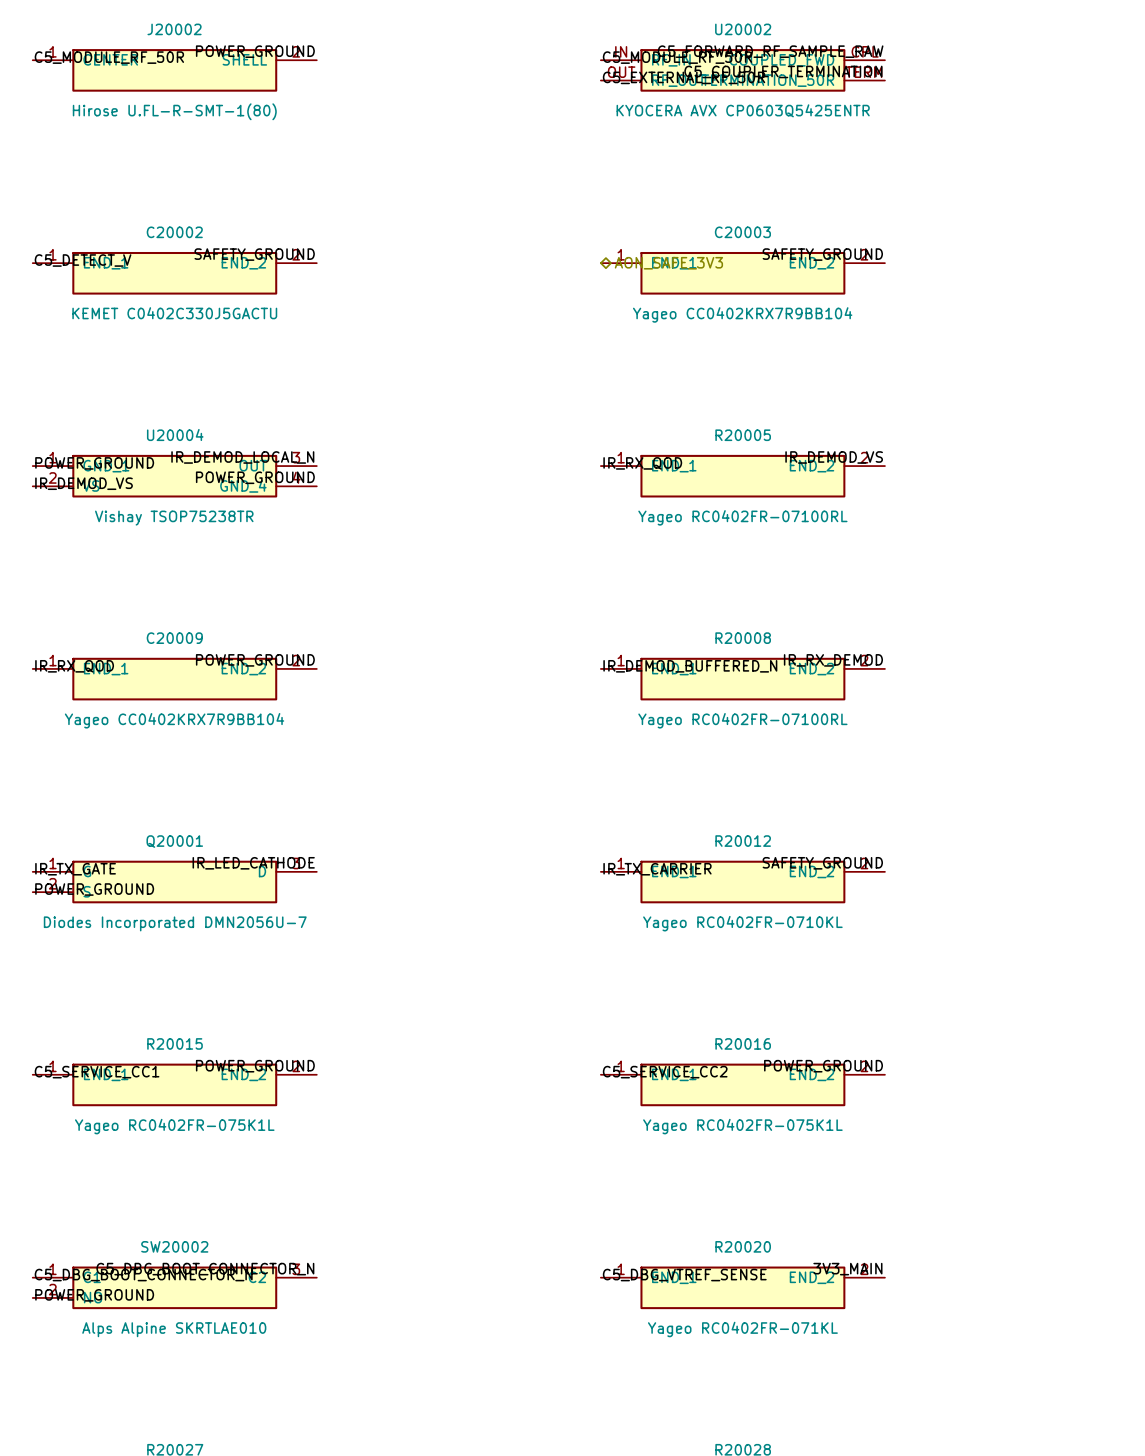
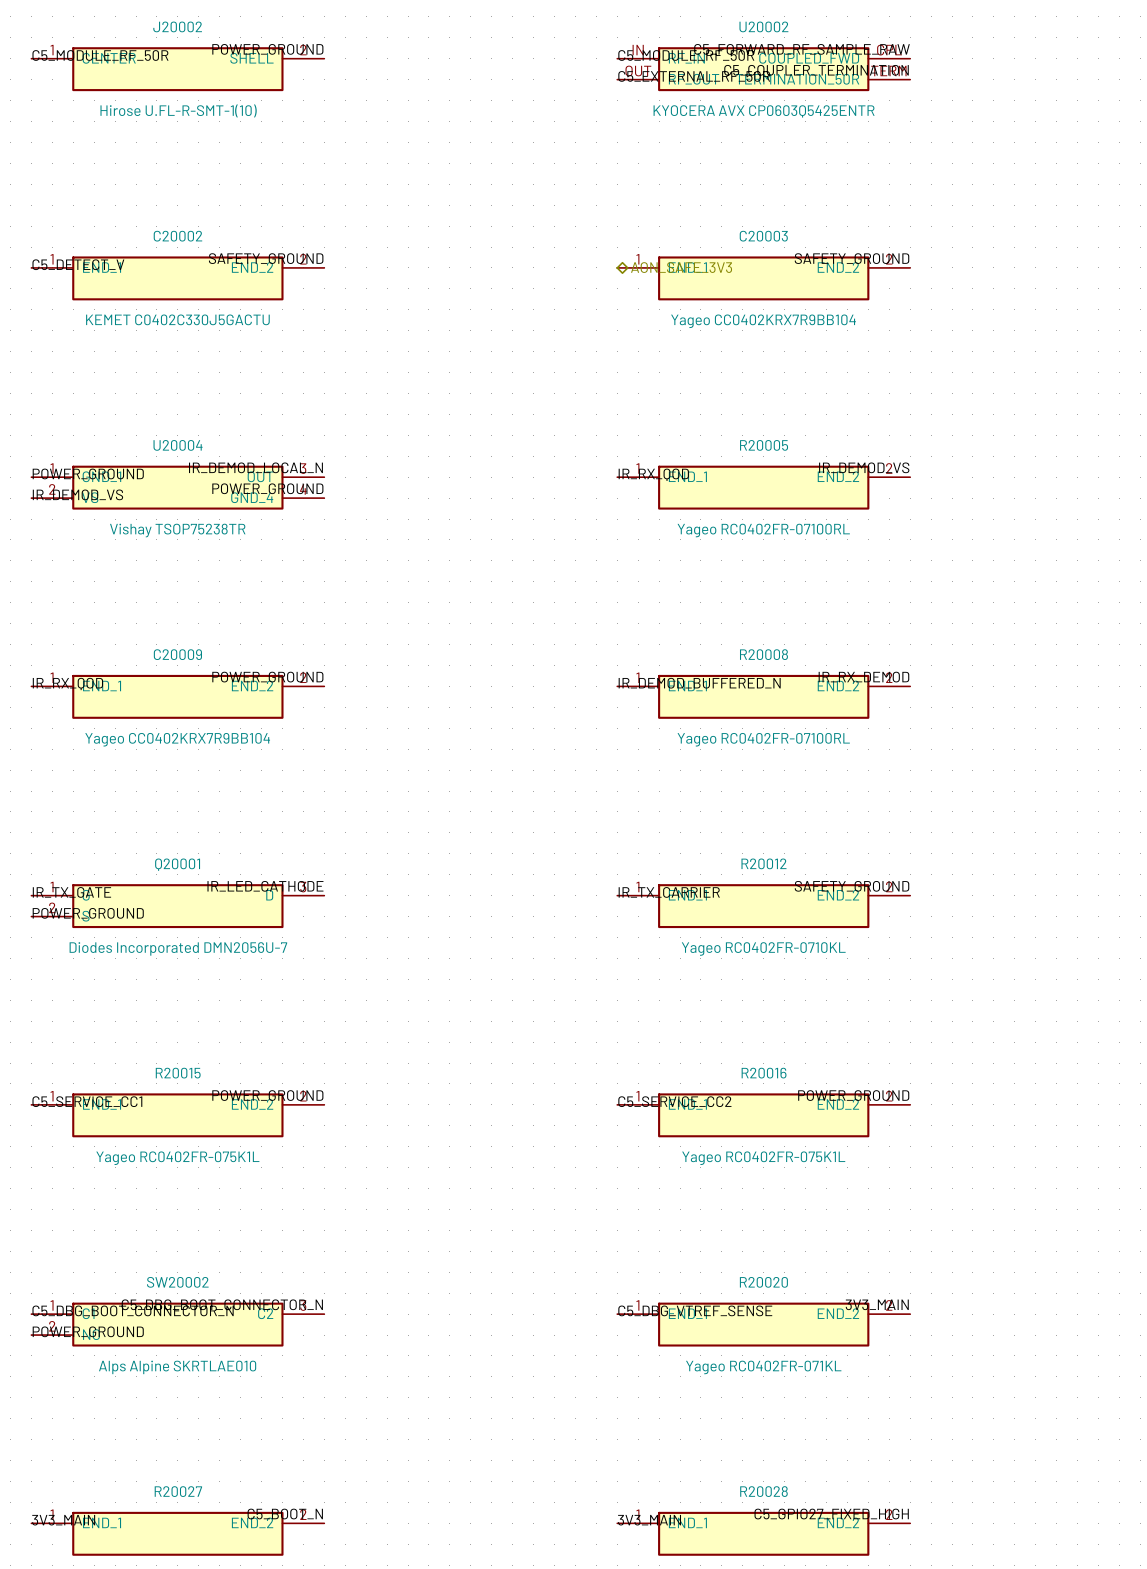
J20002 value: Hirose U.FL-R-SMT-1(80) (174, 111) -> Hirose U.FL-R-SMT-1(10) (178, 110)

